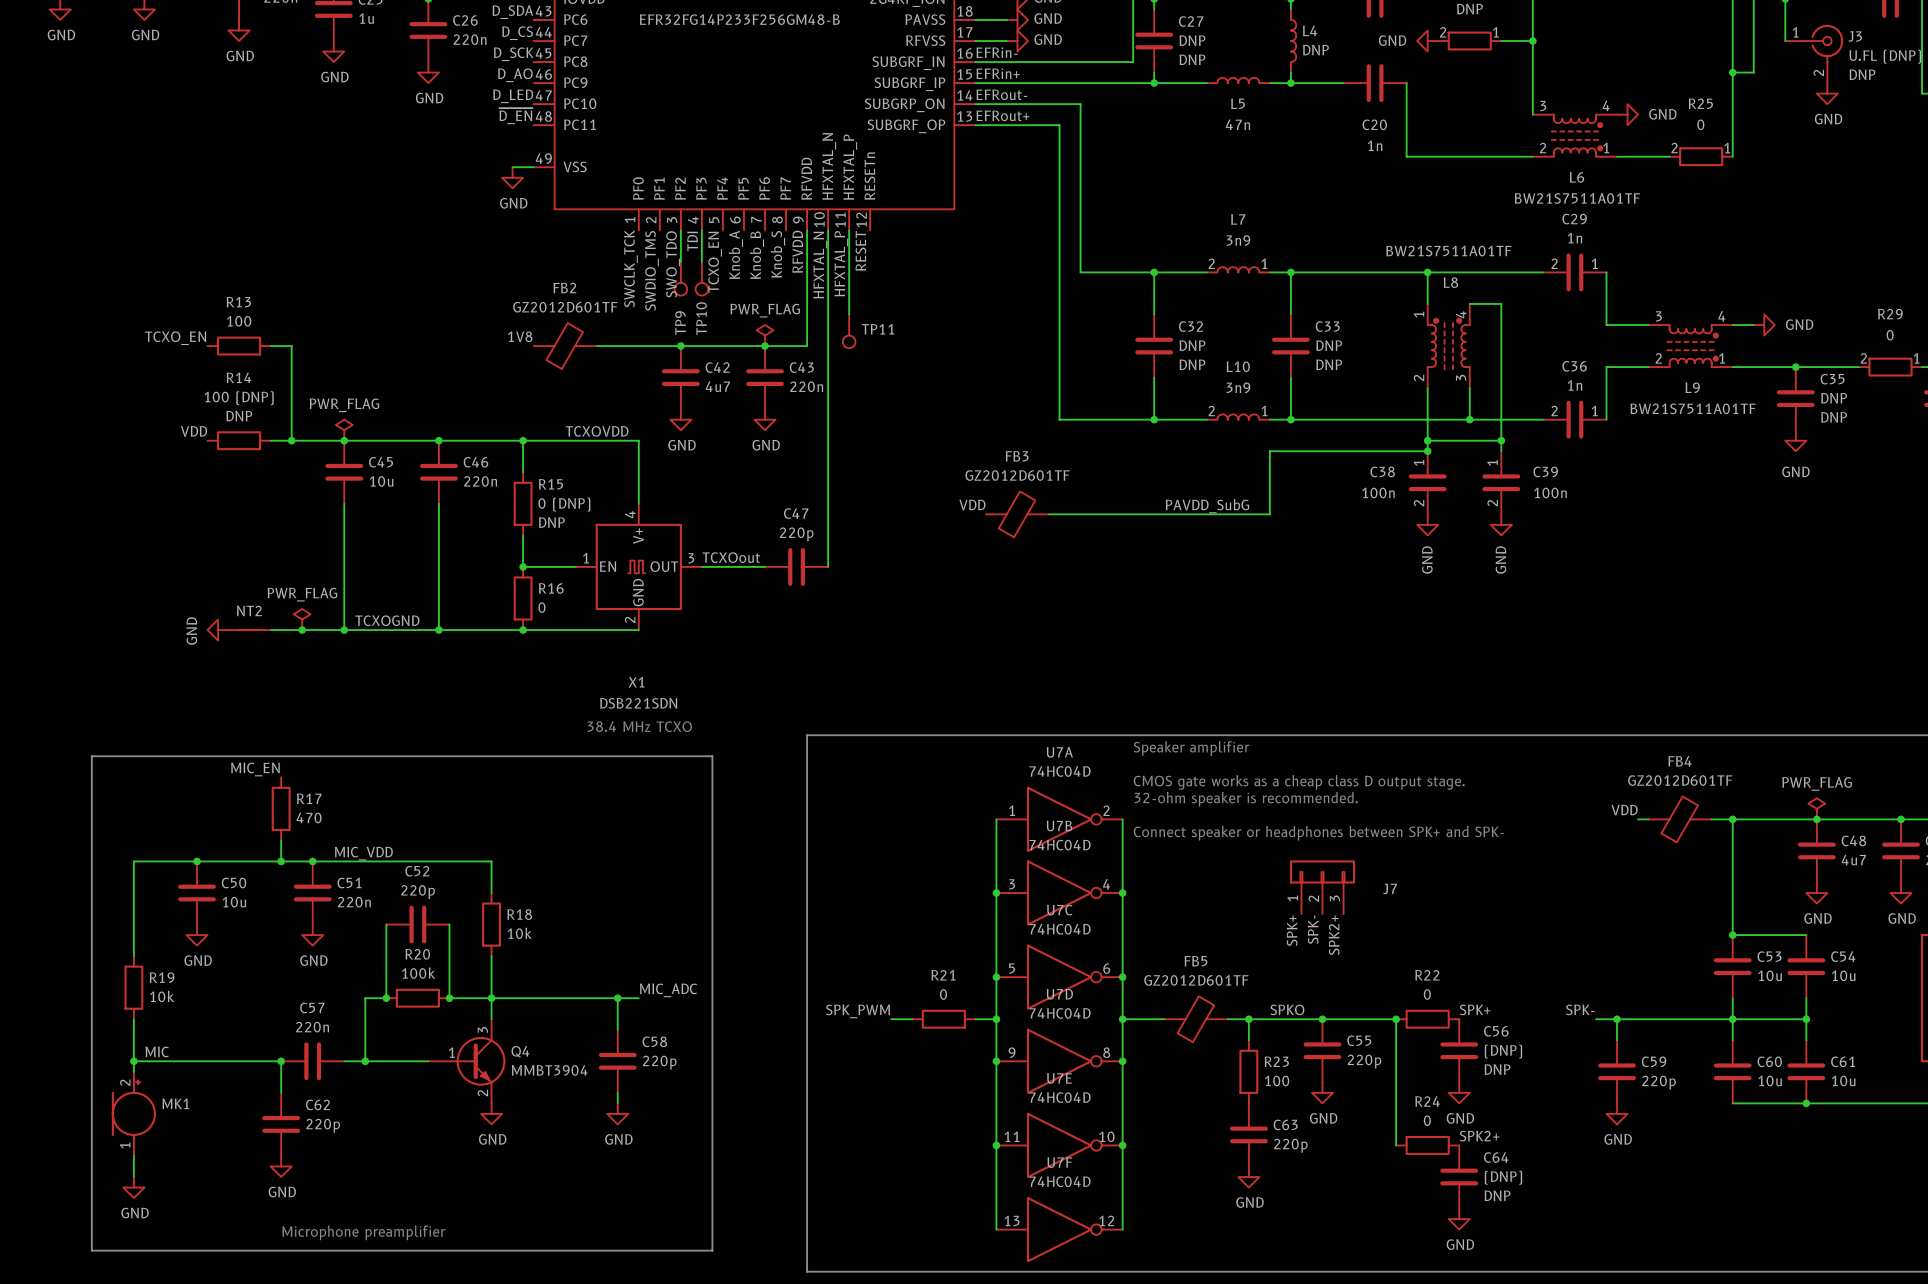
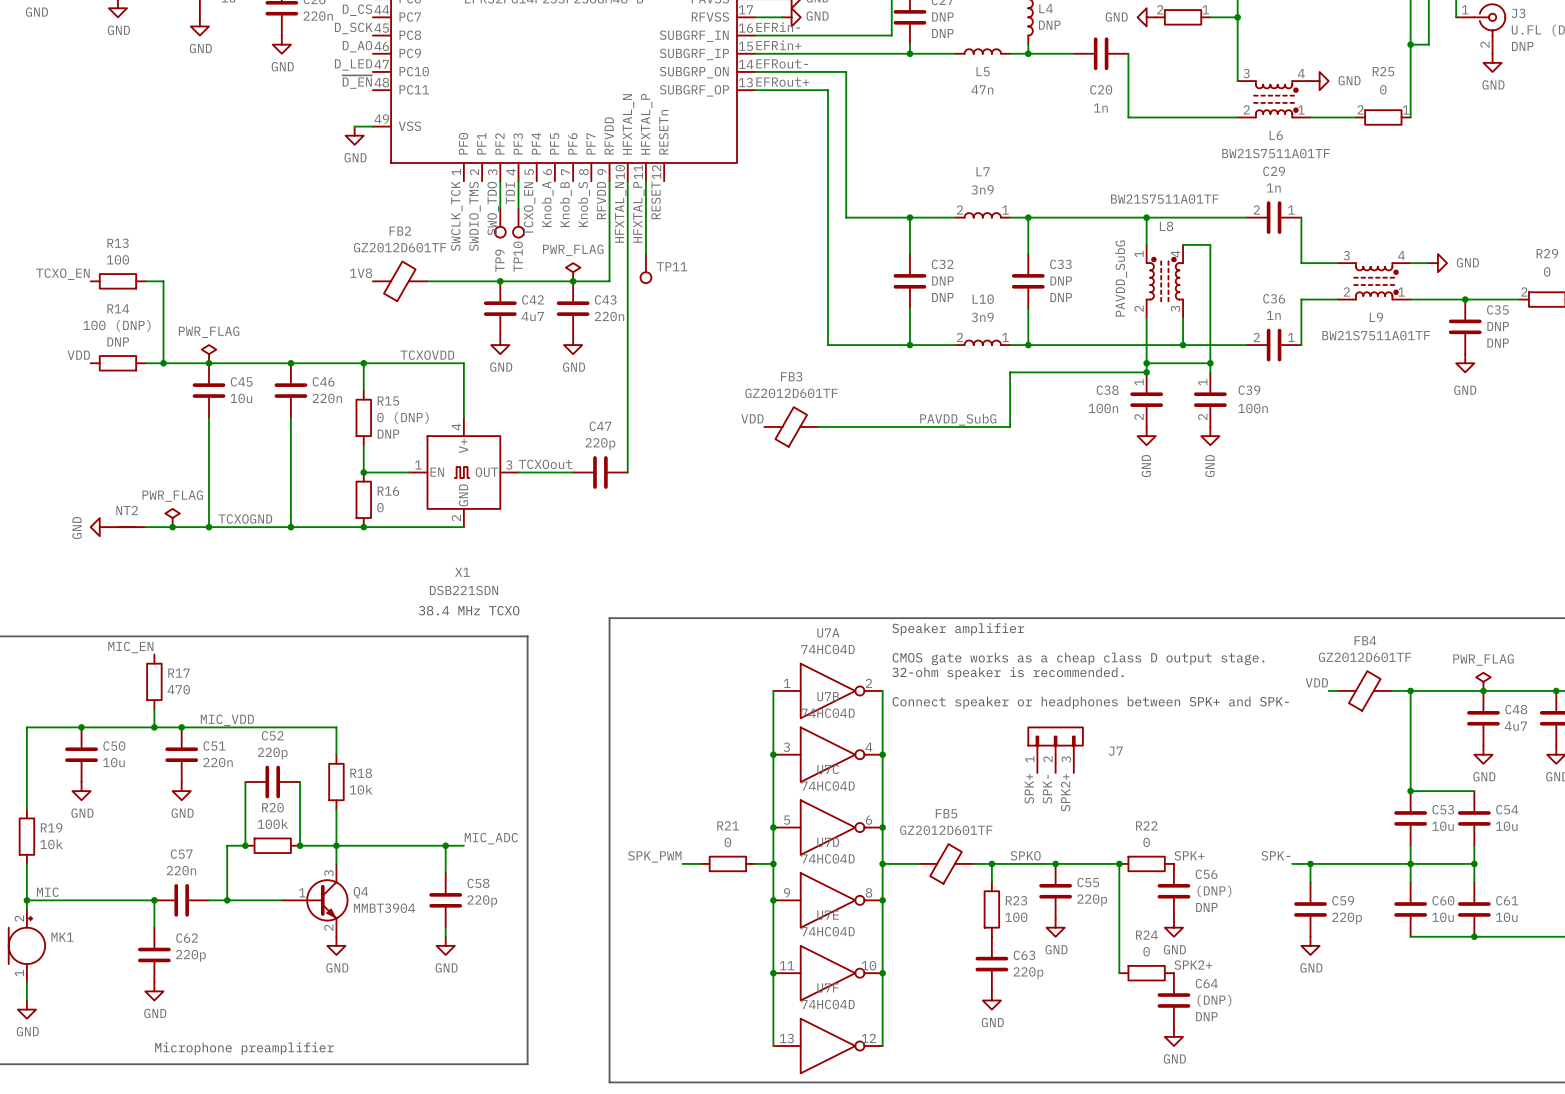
label: none -> PAVDD_SubG (1121, 278)

